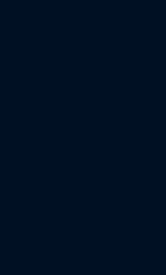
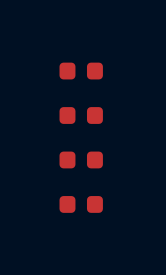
part: none -> (81, 71)
part: none -> (81, 115)
part: none -> (81, 159)
part: none -> (81, 204)

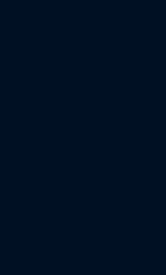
part: (81, 71) -> none
part: (81, 115) -> none
part: (81, 159) -> none
part: (81, 204) -> none

